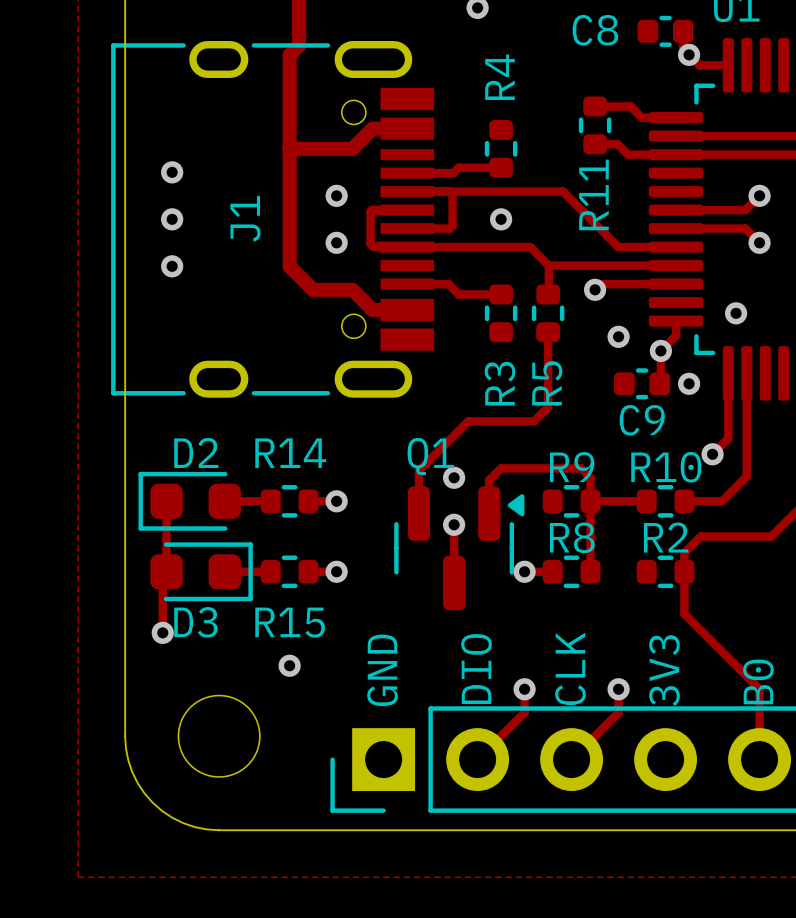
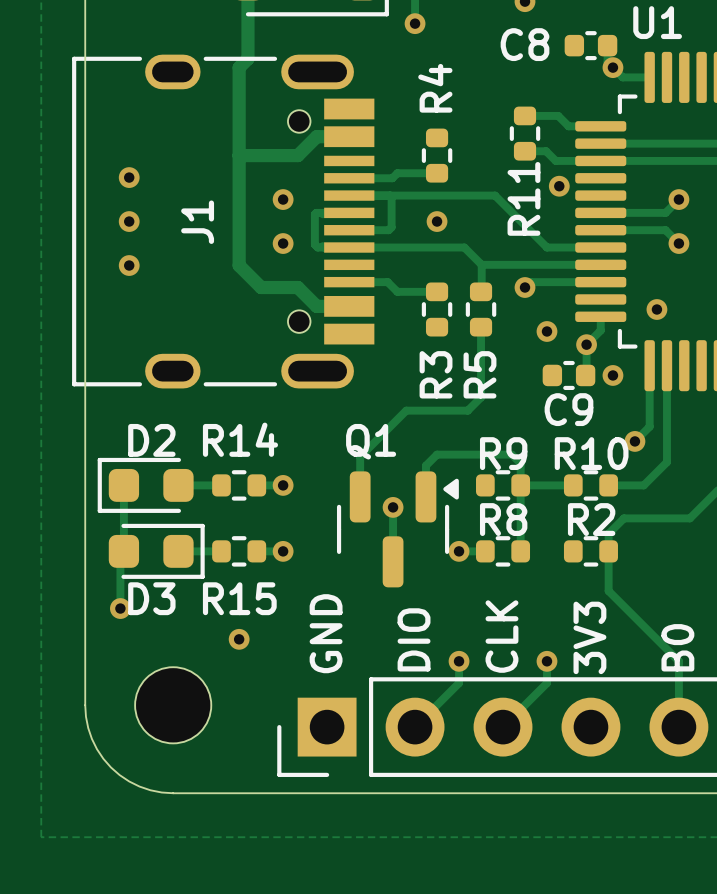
via: none -> (559, 186)
via: (454, 477) -> none

